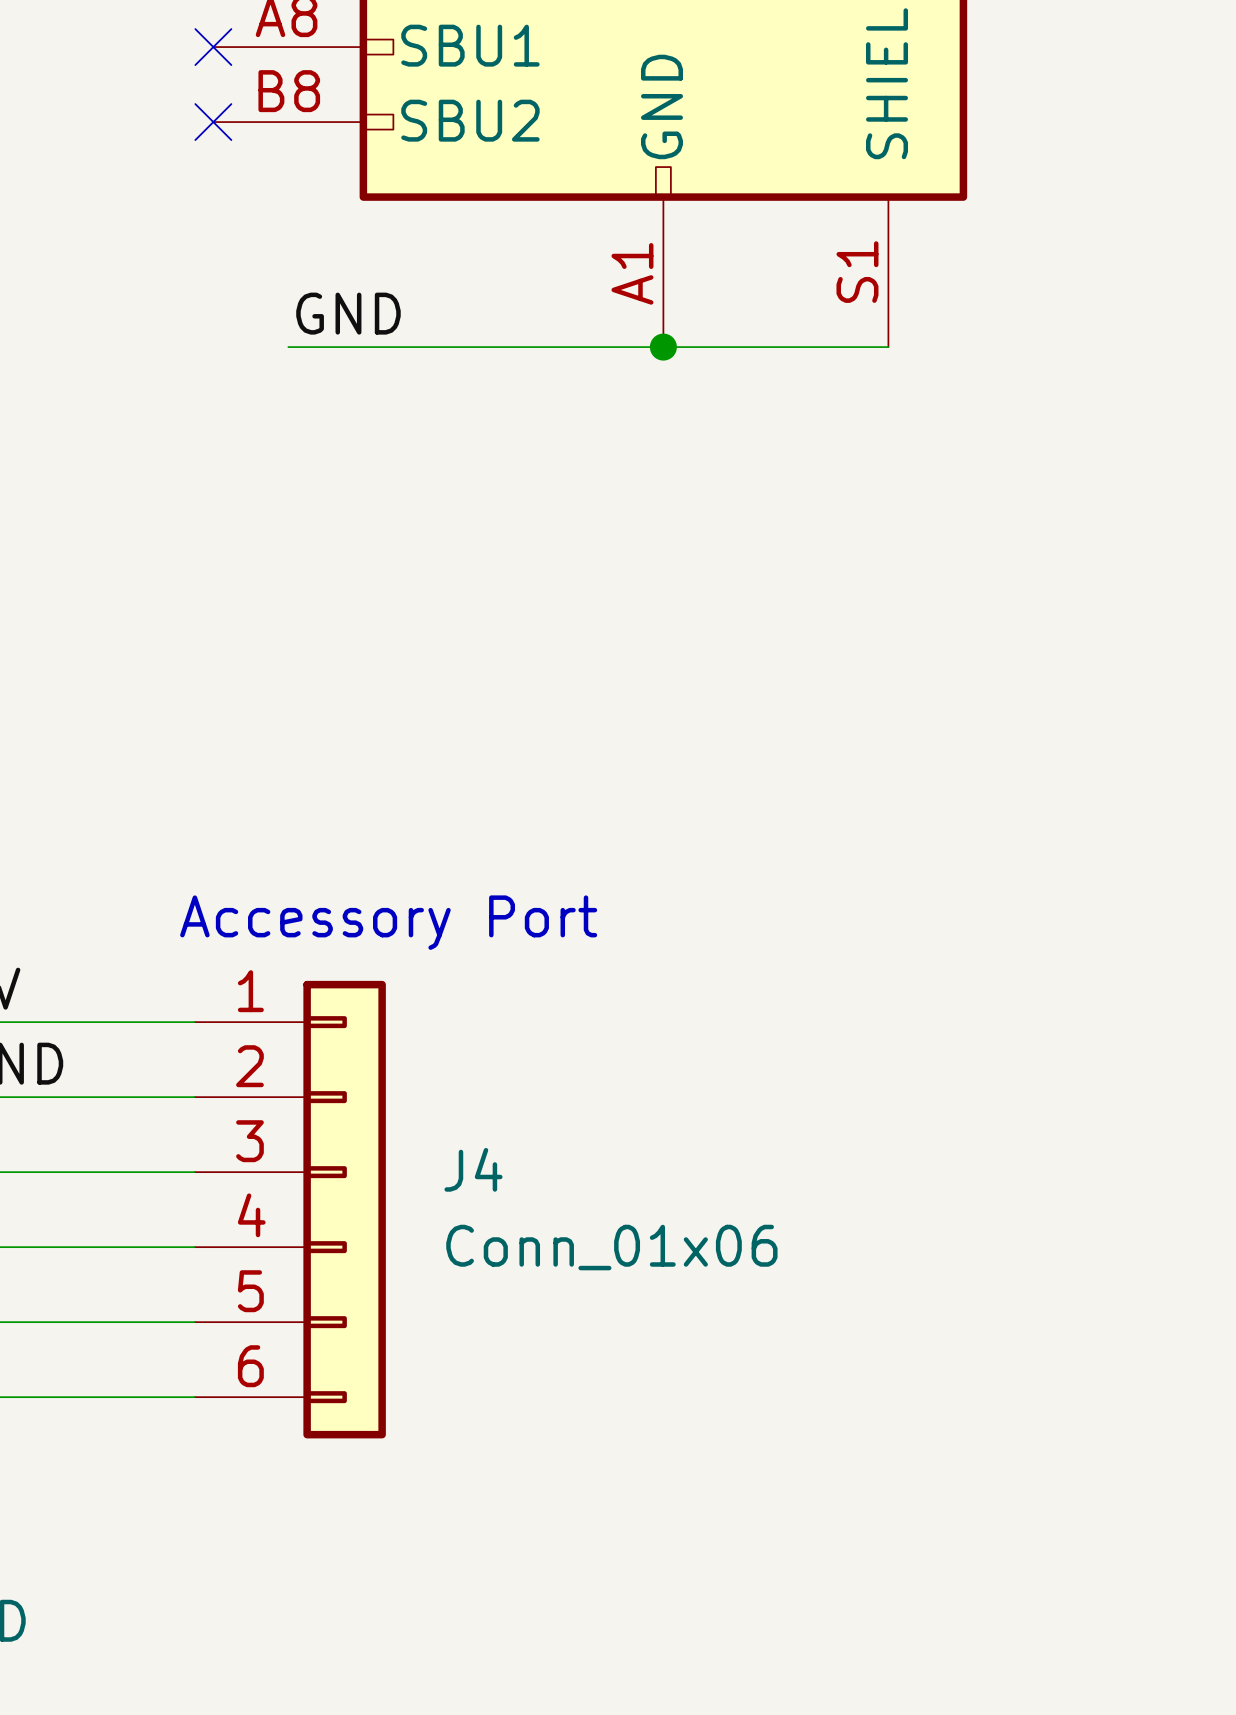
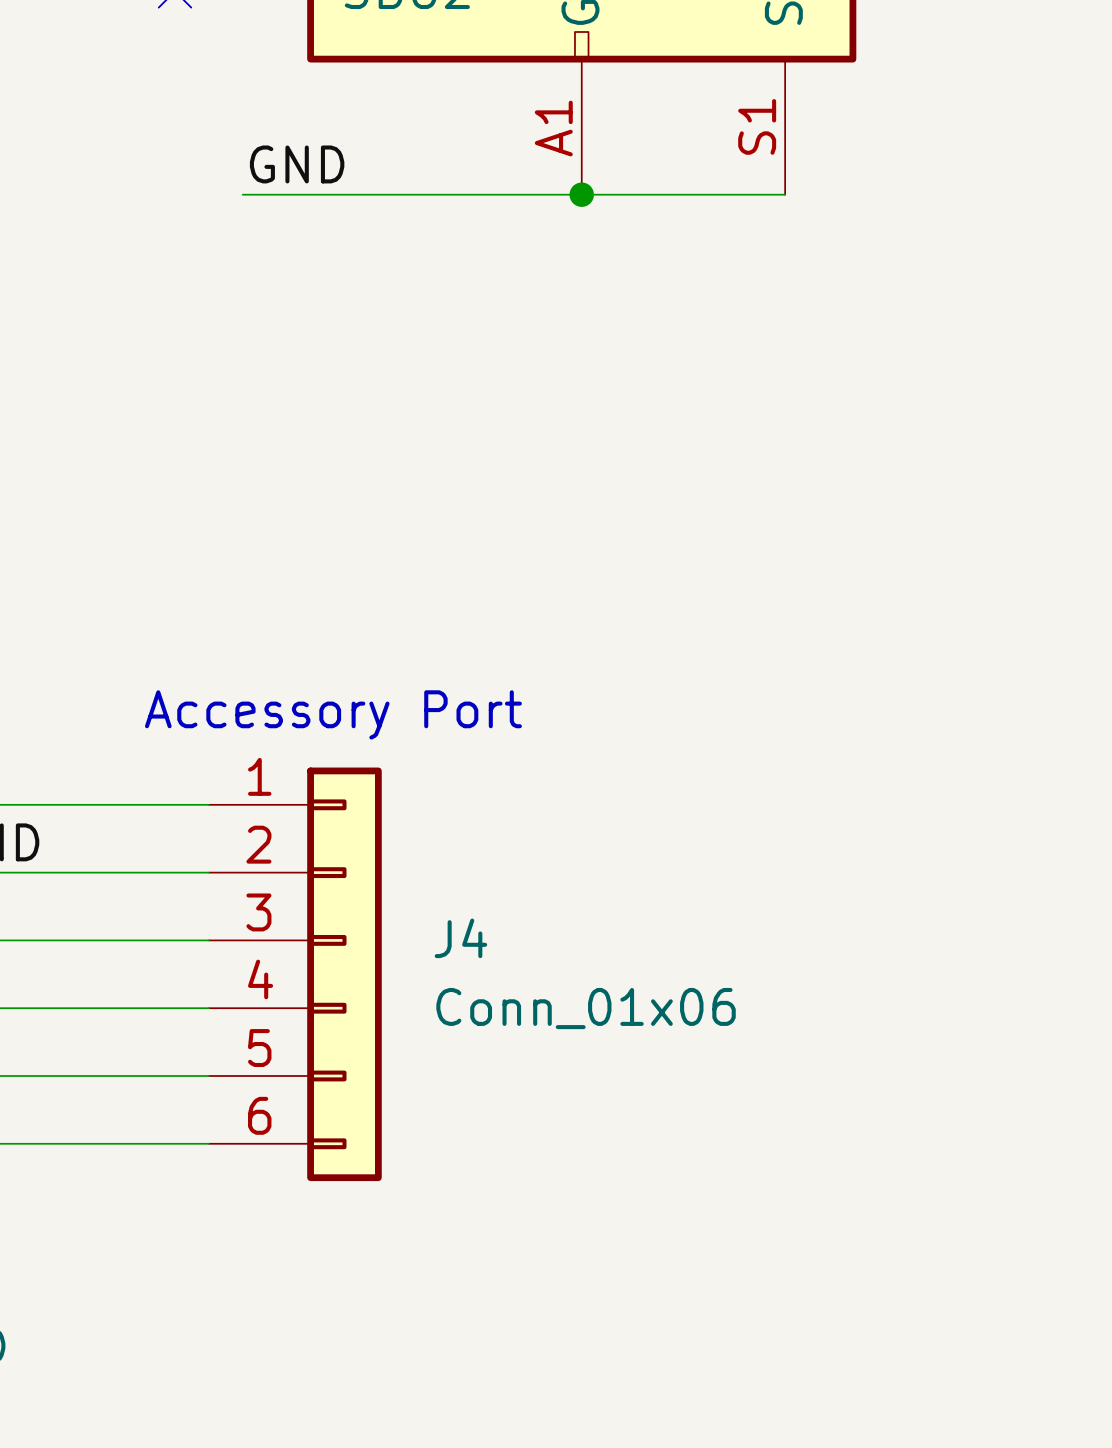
J4 position: (290, 1209) -> (295, 974)

